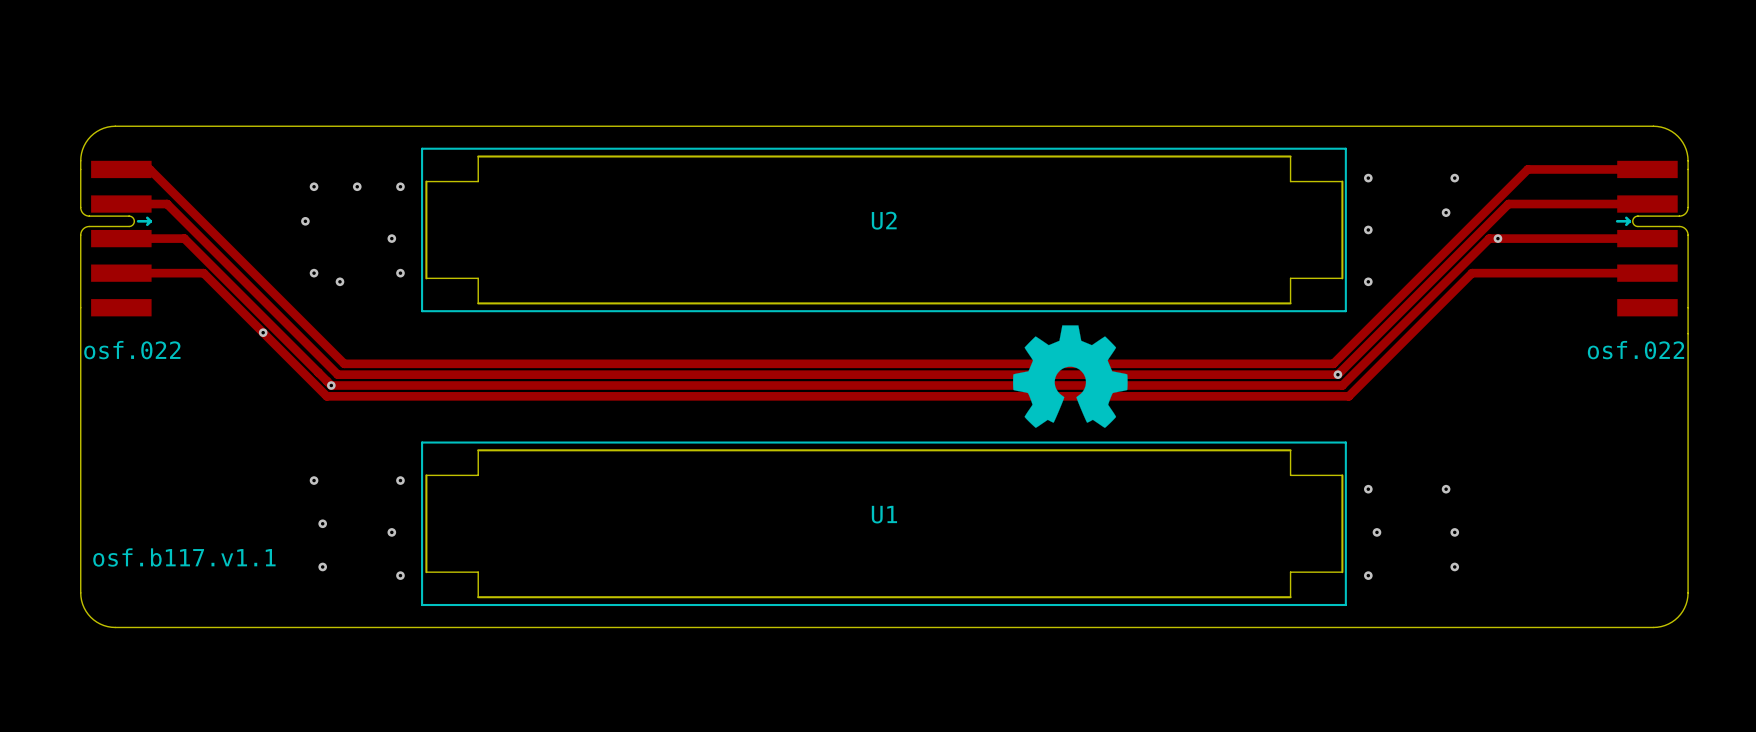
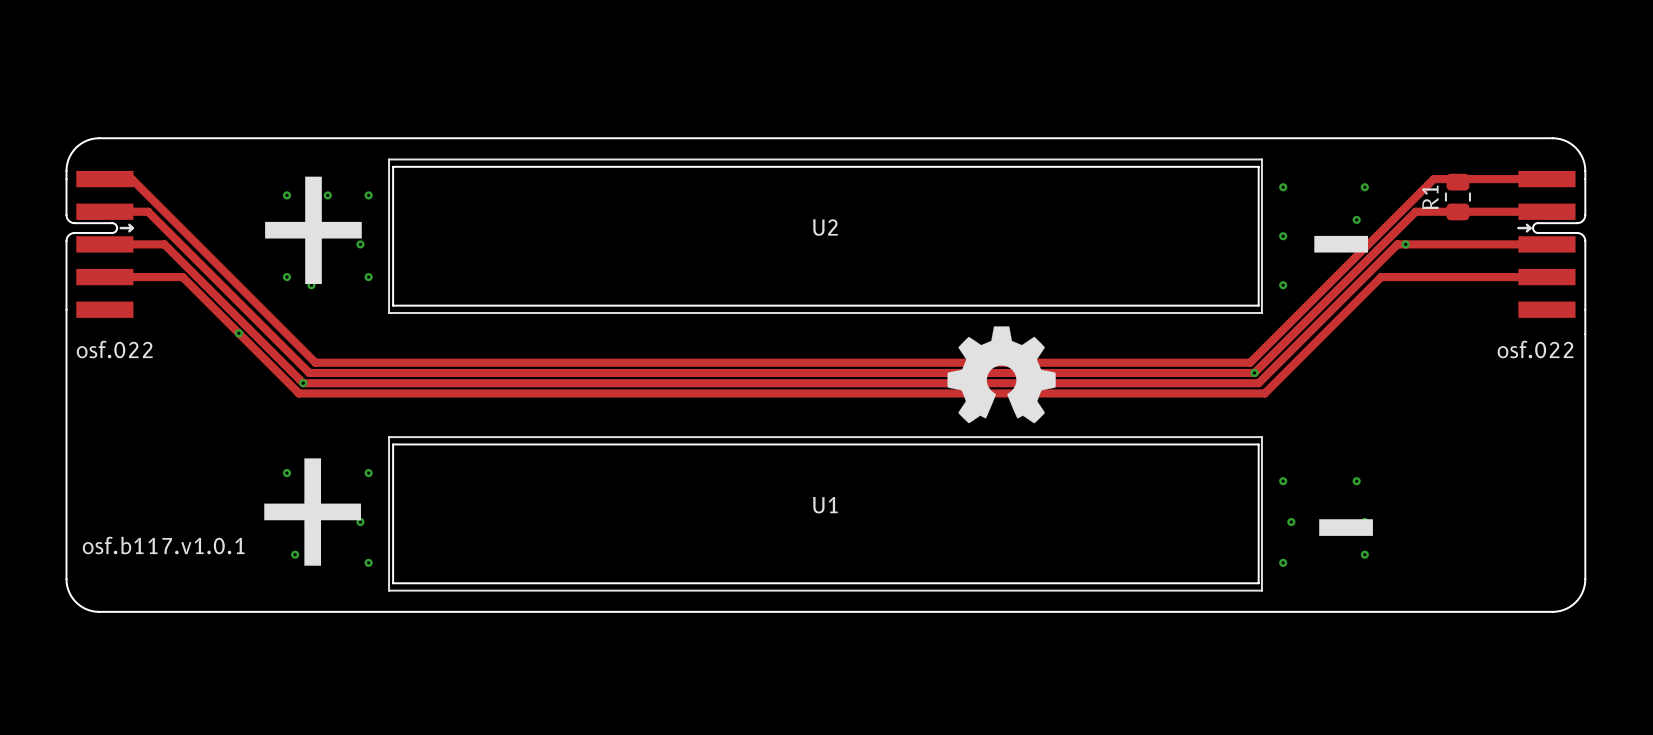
U2 footprint: [421, 147, 1347, 313] -> [388, 158, 1263, 314]
R1: none -> (1457, 197)
text: none -> + (313, 230)
text: none -> - (1341, 244)
U1 footprint: [421, 441, 1347, 607] -> [388, 436, 1263, 592]
text: none -> + (312, 512)
text: none -> - (1346, 527)
text: osf.b117.v1.1 (184, 557) -> osf.b117.v1.0.1 (163, 545)

